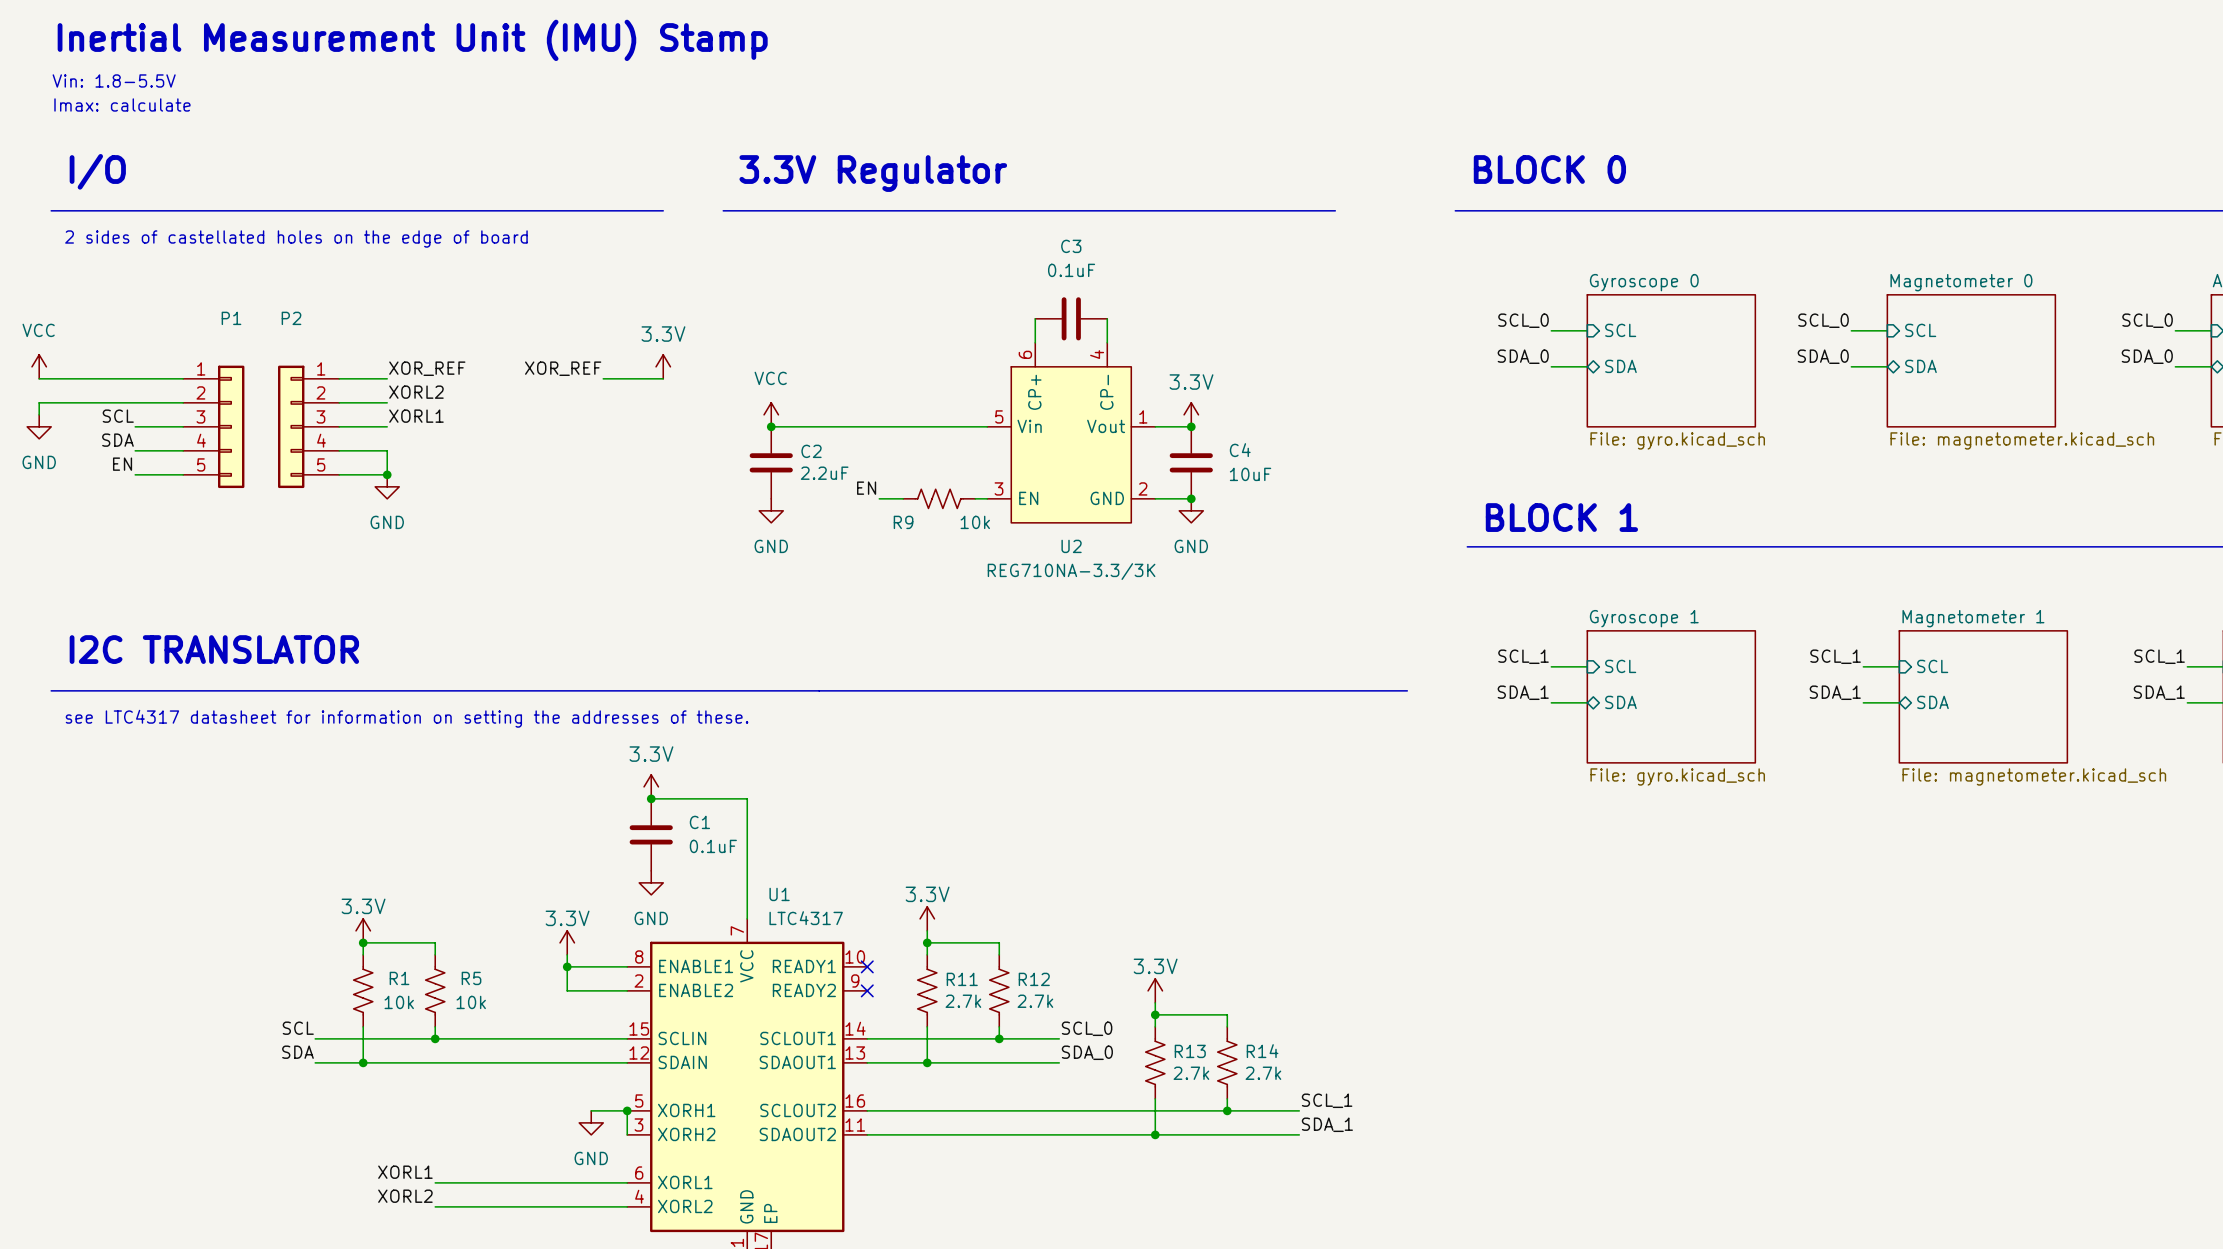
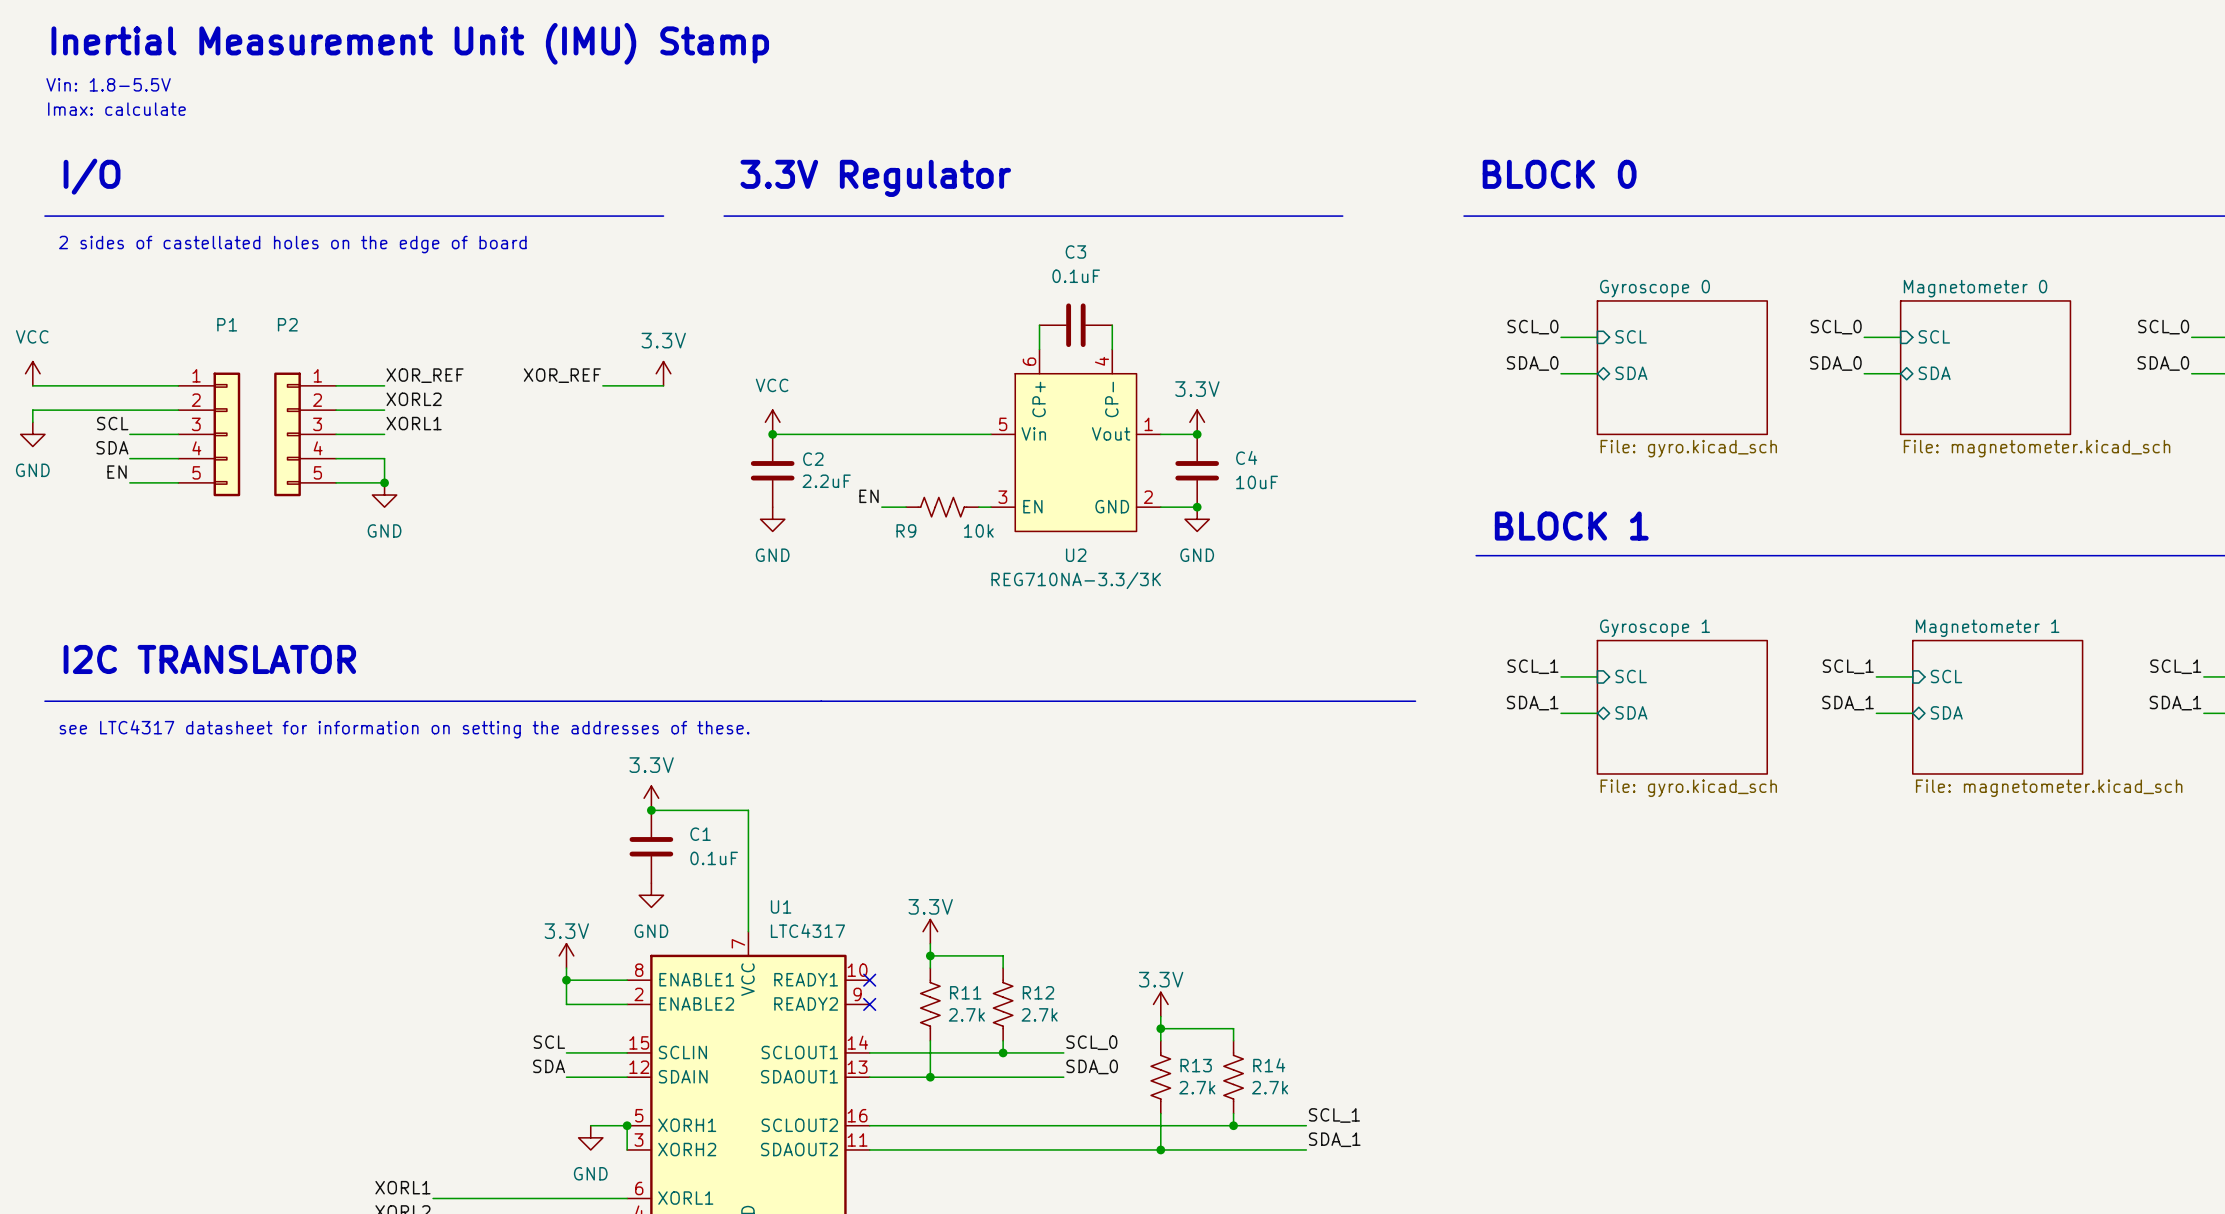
power symbol: 3.3V (363, 930) -> none
junction: (363, 942) -> none
wire: (363, 954) (363, 942) (435, 942) (435, 954) -> none
R1: 10k (363, 990) -> none
R5: 10k (435, 990) -> none
wire: (363, 1026) (363, 1062) -> none
wire: (435, 1026) (435, 1038) -> none
label: SCL (298, 1028) -> none
label: none -> SCL (549, 1042)
wire: (315, 1038) (567, 1038) -> none
junction: (435, 1038) -> none
label: SDA (297, 1052) -> none
label: none -> SDA (549, 1066)
wire: (315, 1062) (567, 1062) -> none
junction: (363, 1062) -> none

